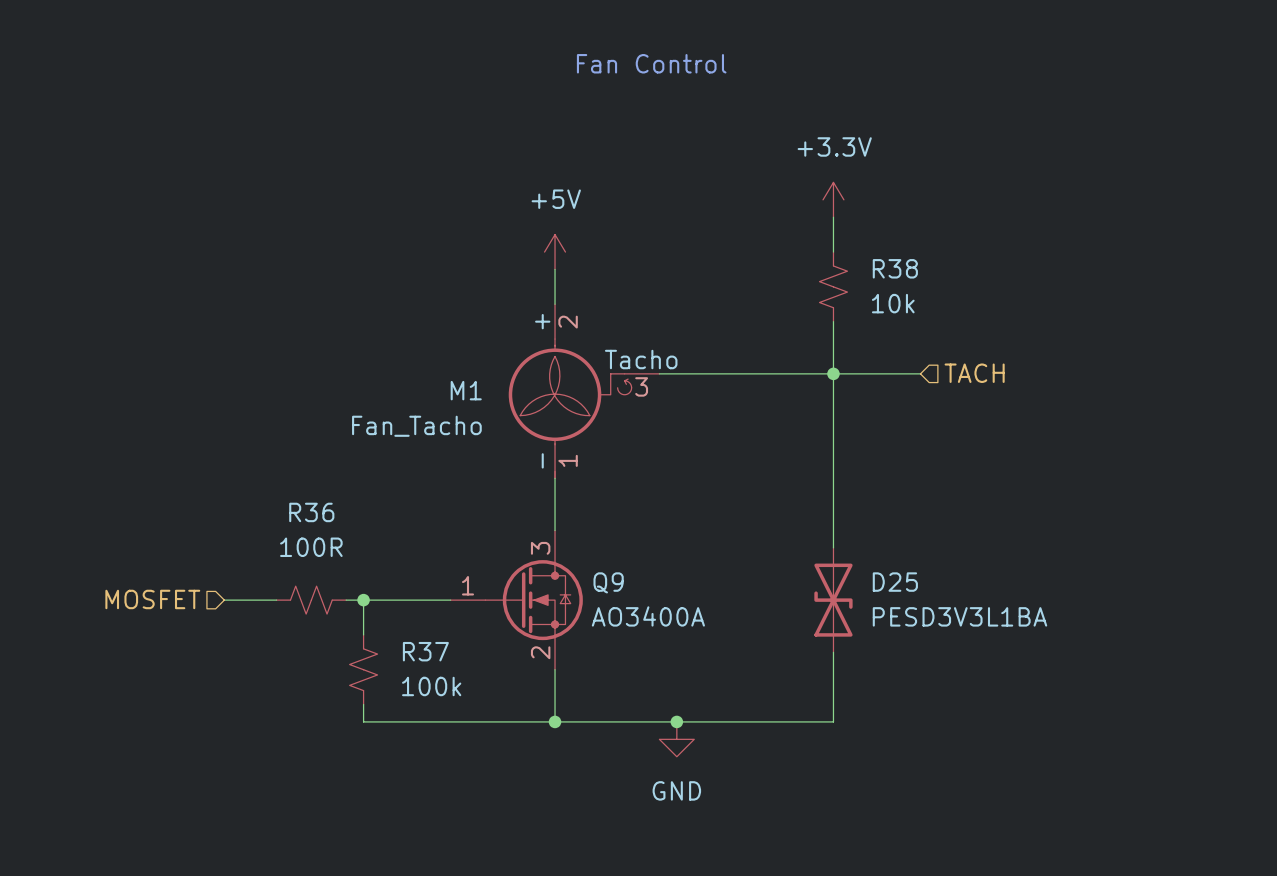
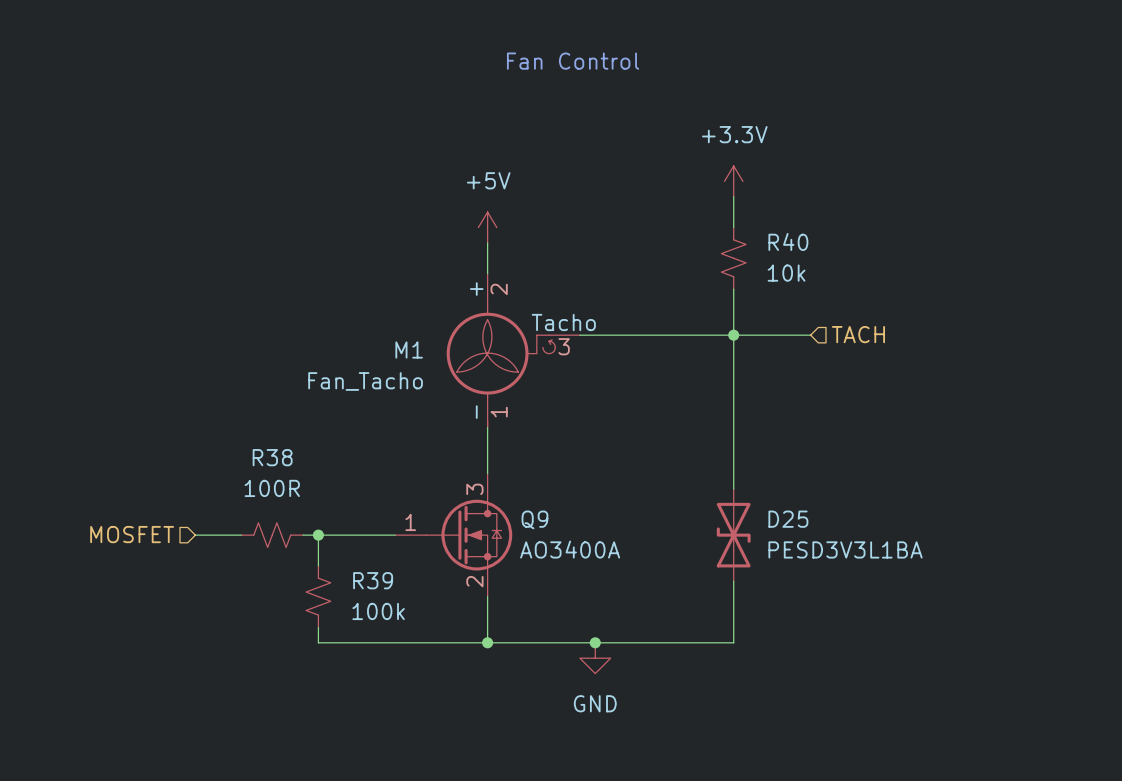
R38 name: R38 (895, 268) -> R40 (788, 241)
R36 name: R36 (311, 512) -> R38 (272, 457)
R37 name: R37 (425, 651) -> R39 (373, 580)

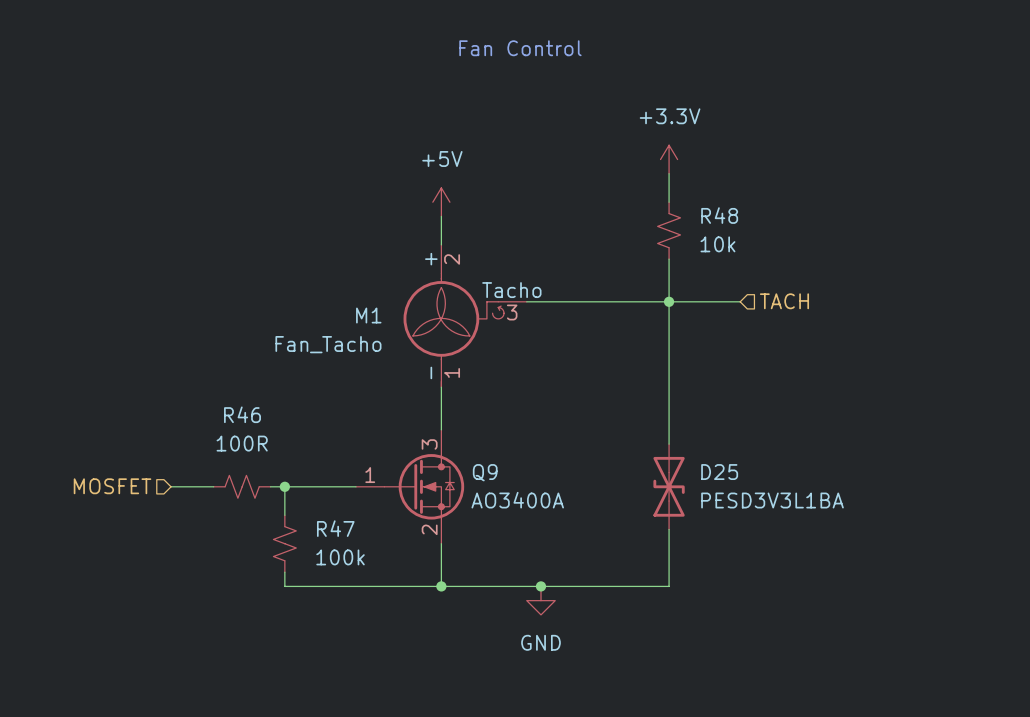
R40 name: R40 (788, 241) -> R48 (719, 215)
R38 name: R38 (272, 457) -> R46 (242, 414)
R39 name: R39 (373, 580) -> R47 (335, 528)

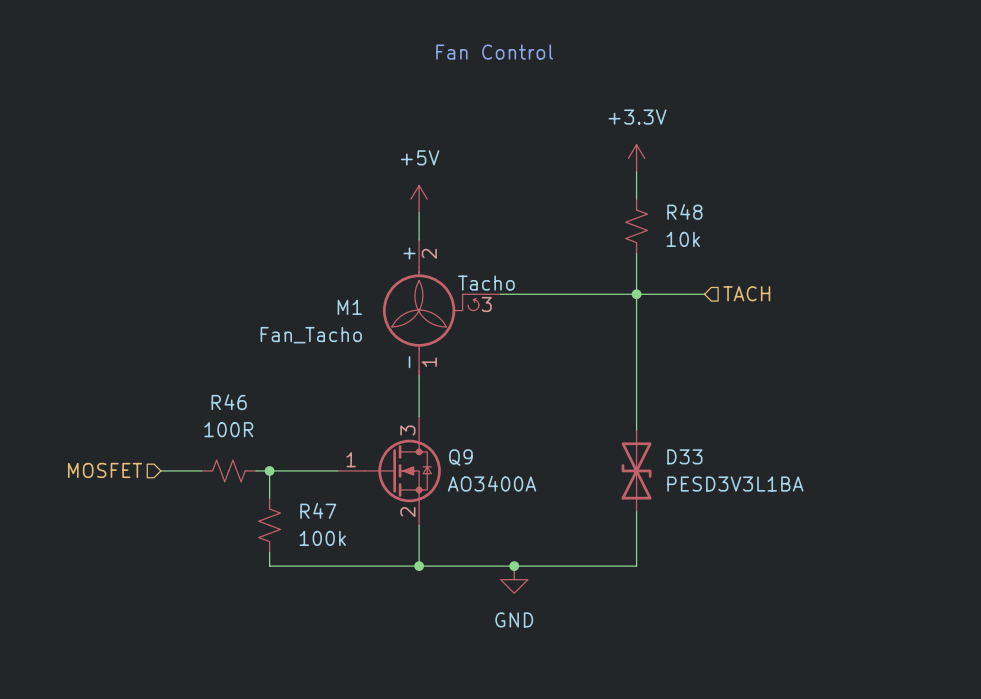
D25 name: D25 (719, 472) -> D33 (684, 456)

